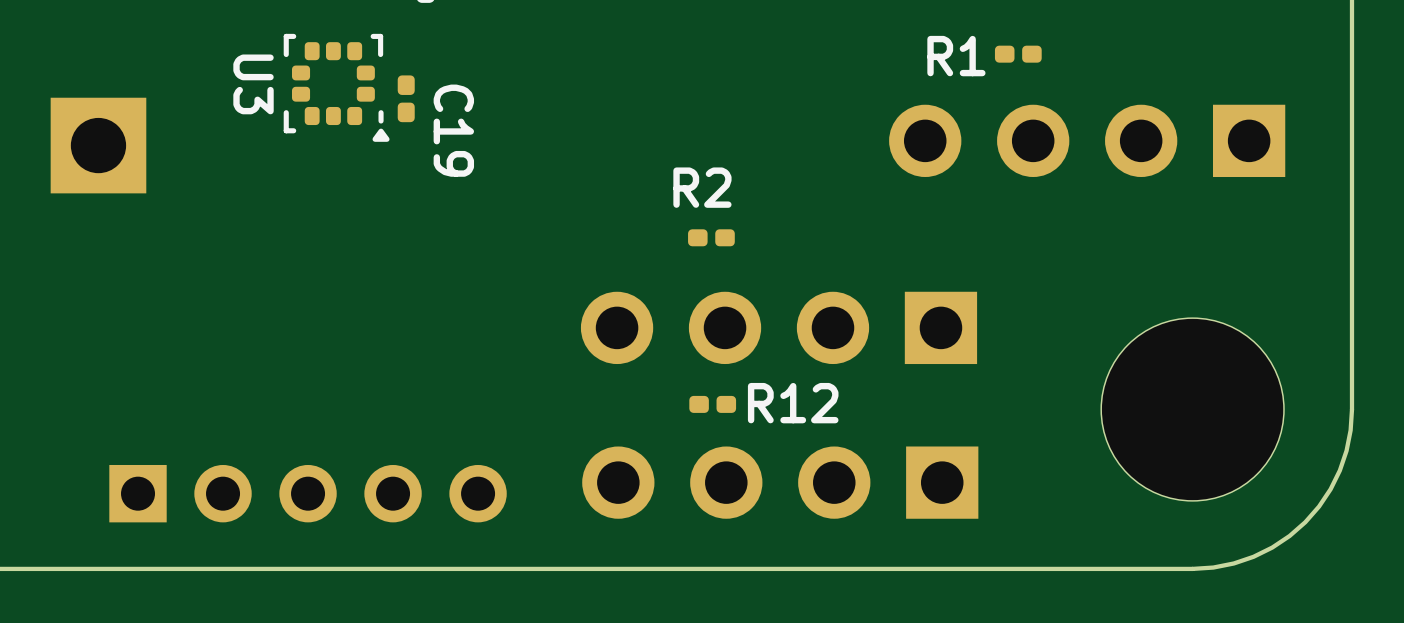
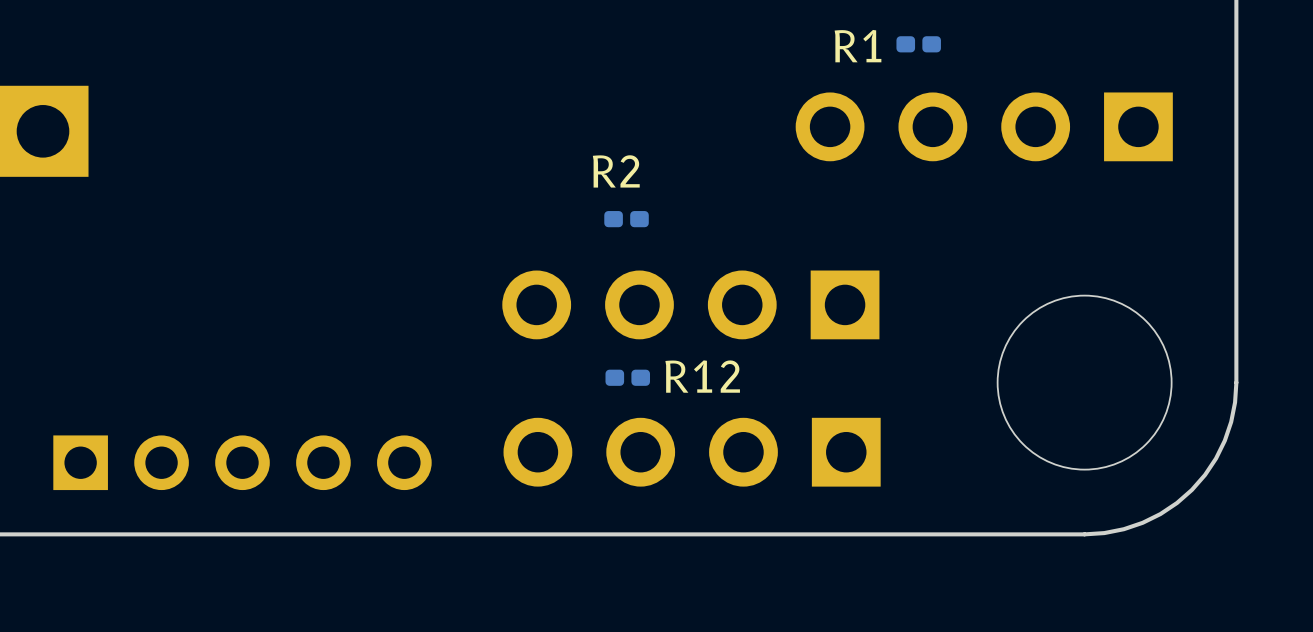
U3: (336, 87) -> none
C19: (406, 98) -> none

